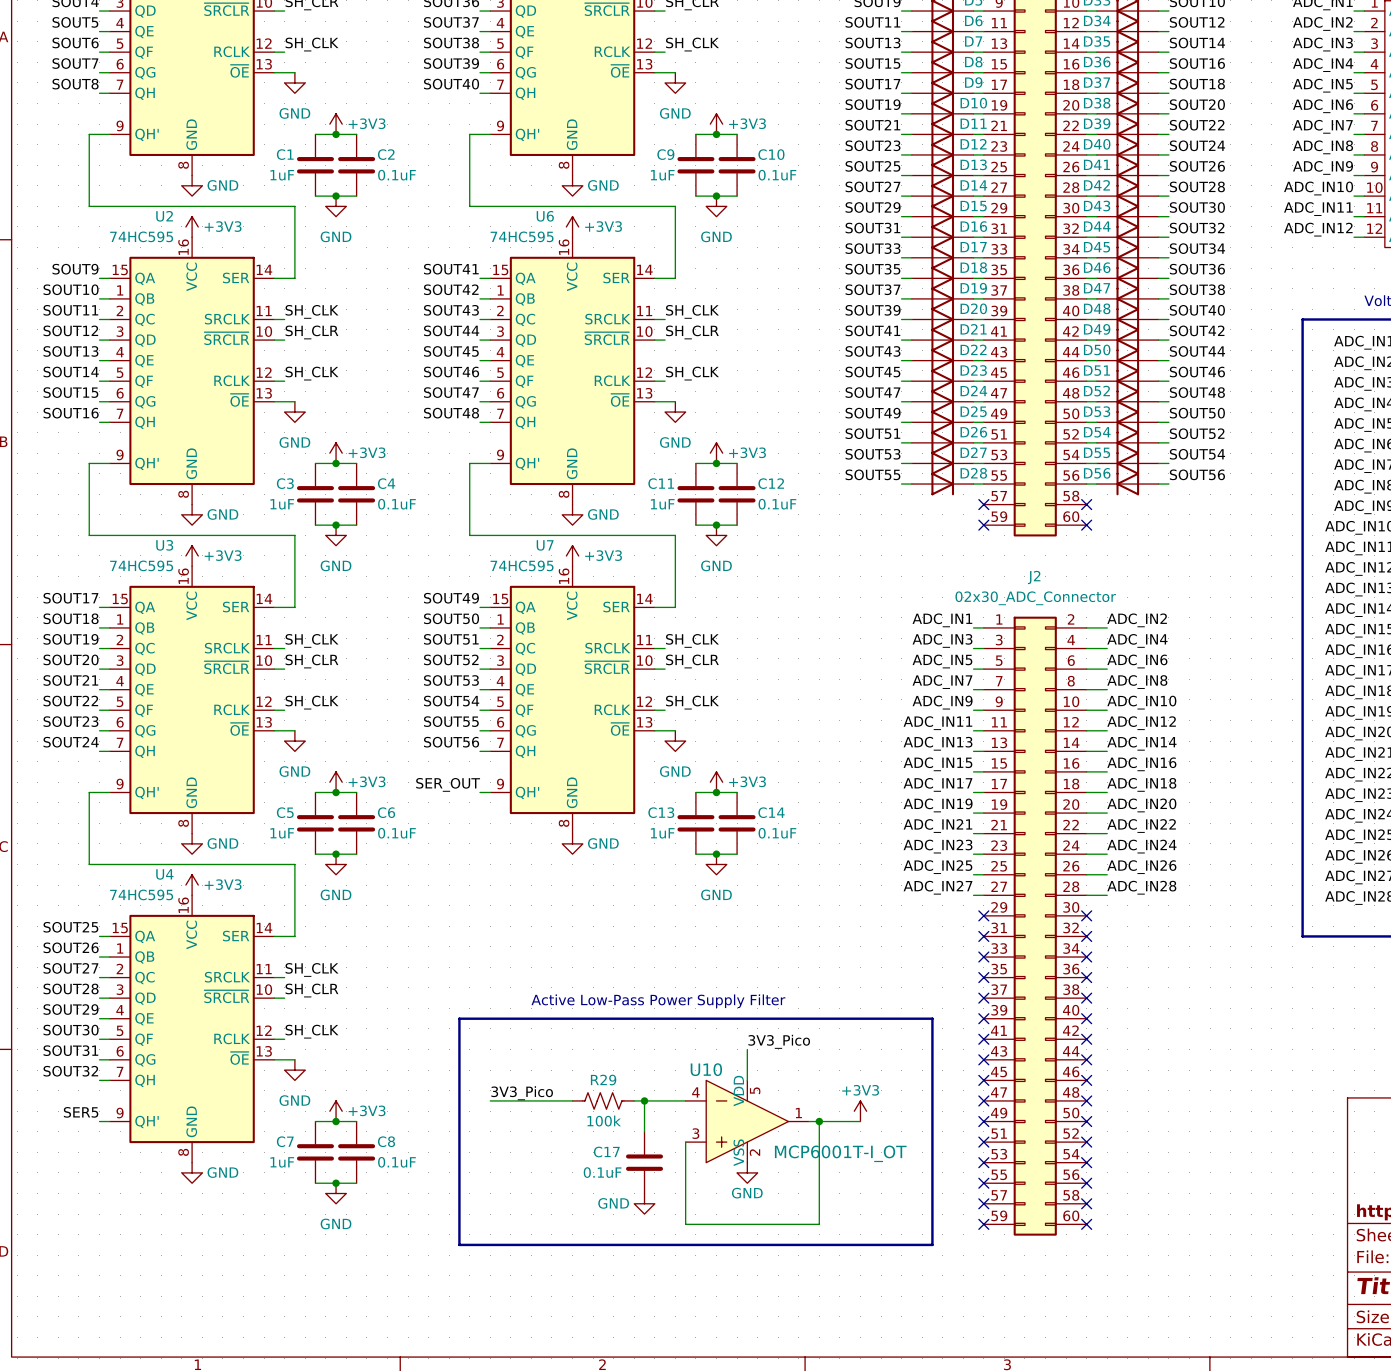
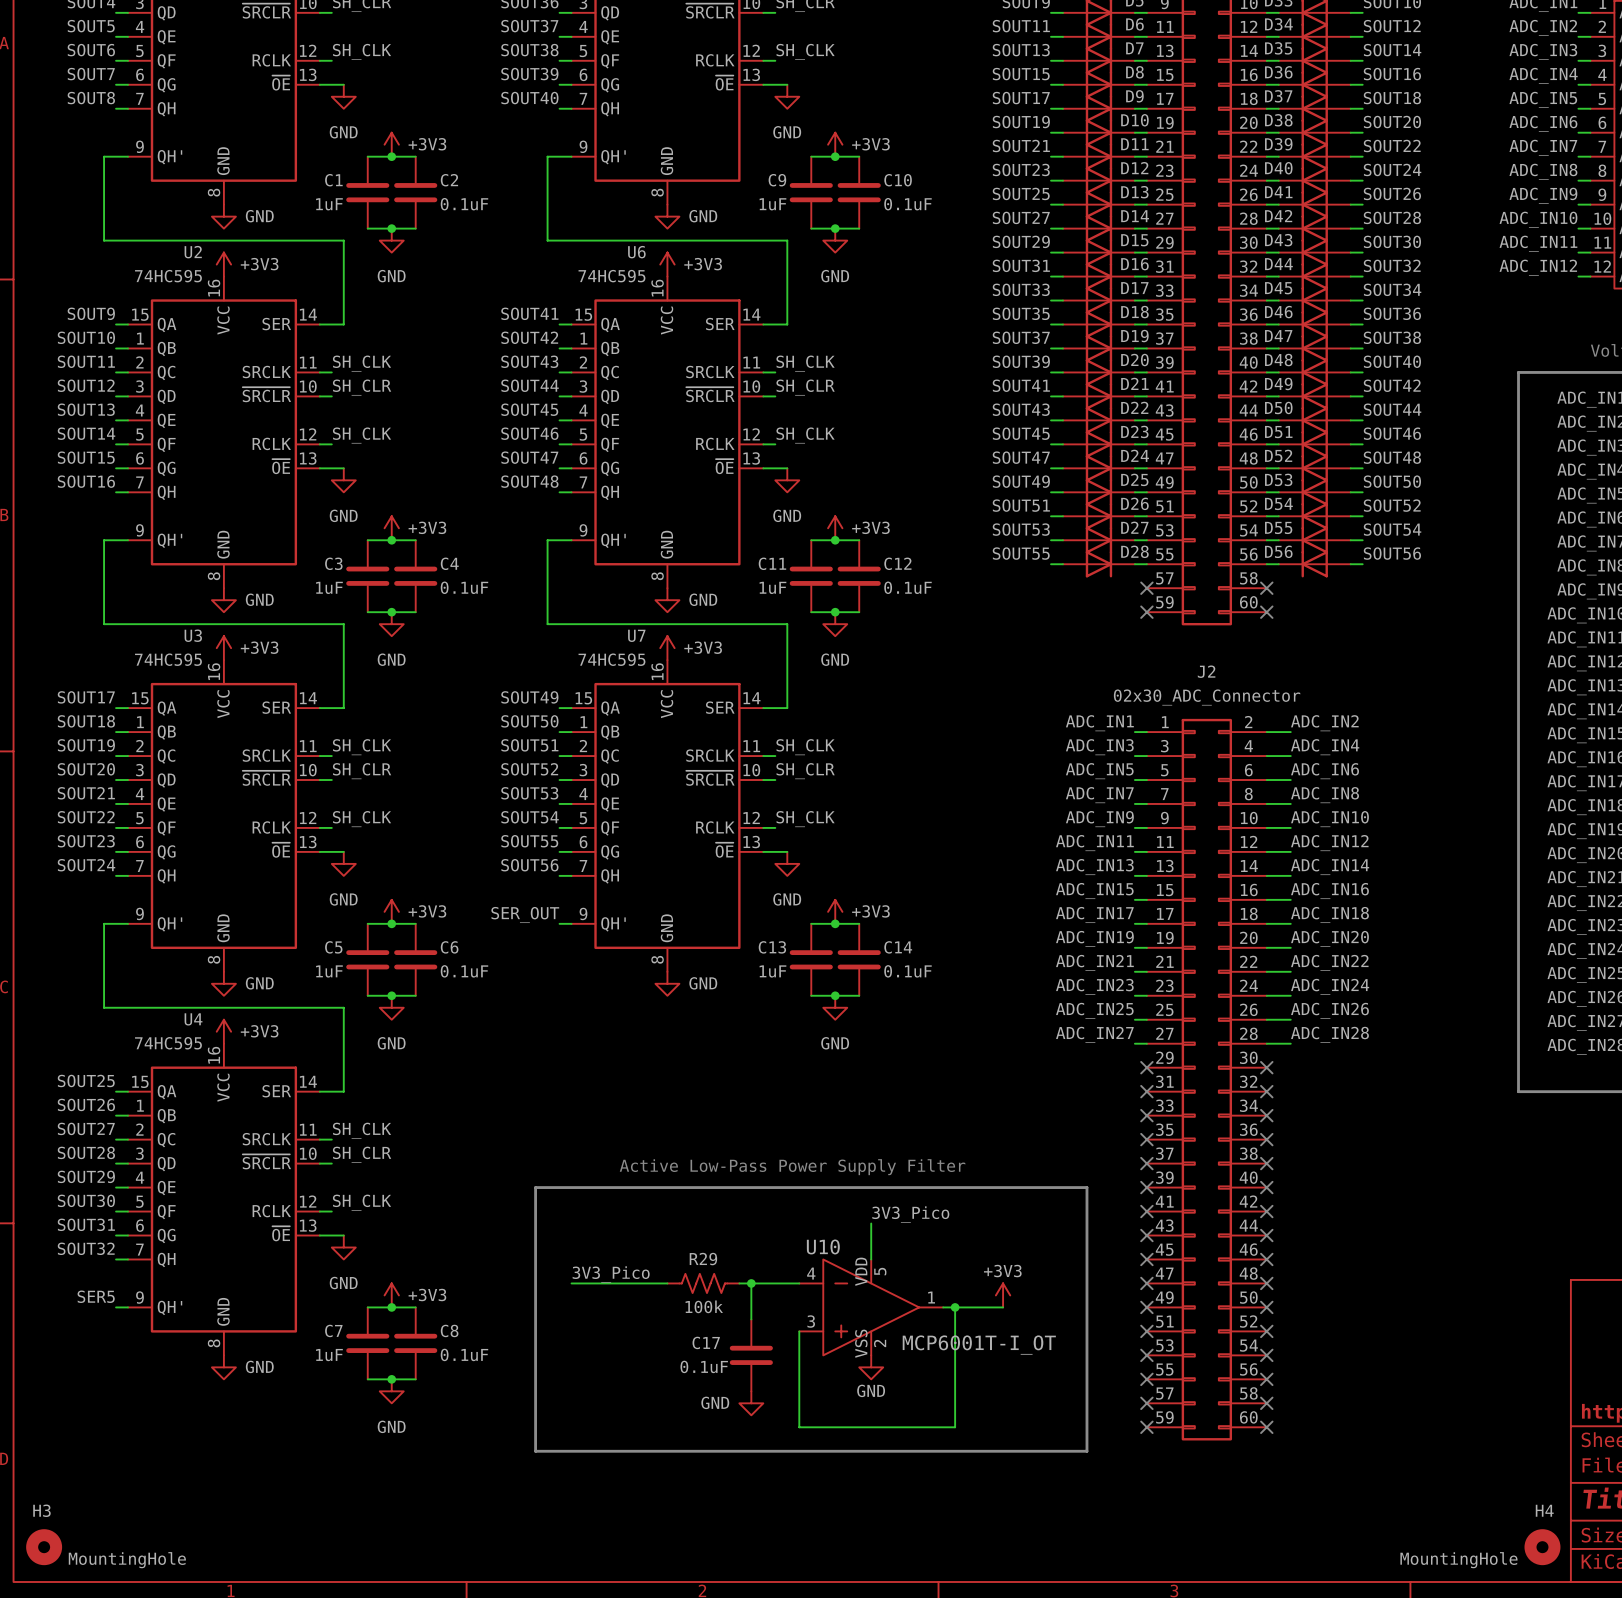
H3: none -> MountingHole (44, 1547)
H4: none -> MountingHole (1542, 1547)

